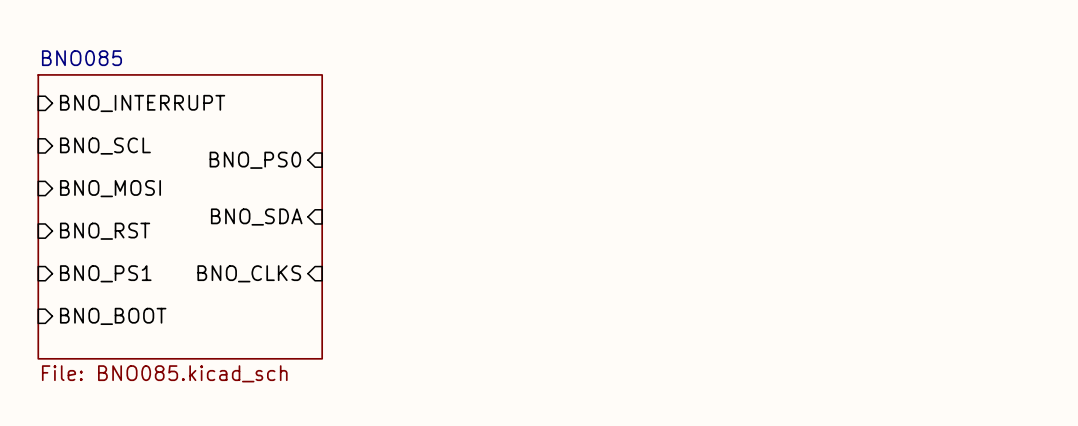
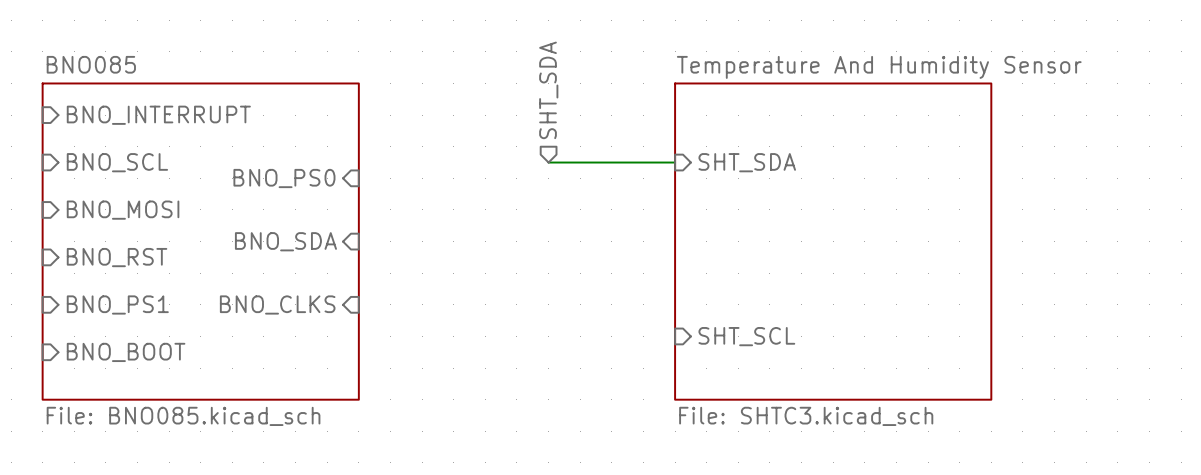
hierarchical label: none -> SHT_SDA (548, 90)
wire: none -> (548, 162) (675, 162)
sheet pin: none -> SHT_SDA (747, 162)
sheet Temperature And Humidity Sensor: none -> File: SHTC3.kicad_sch (833, 241)
sheet pin: none -> SHT_SCL (746, 336)

